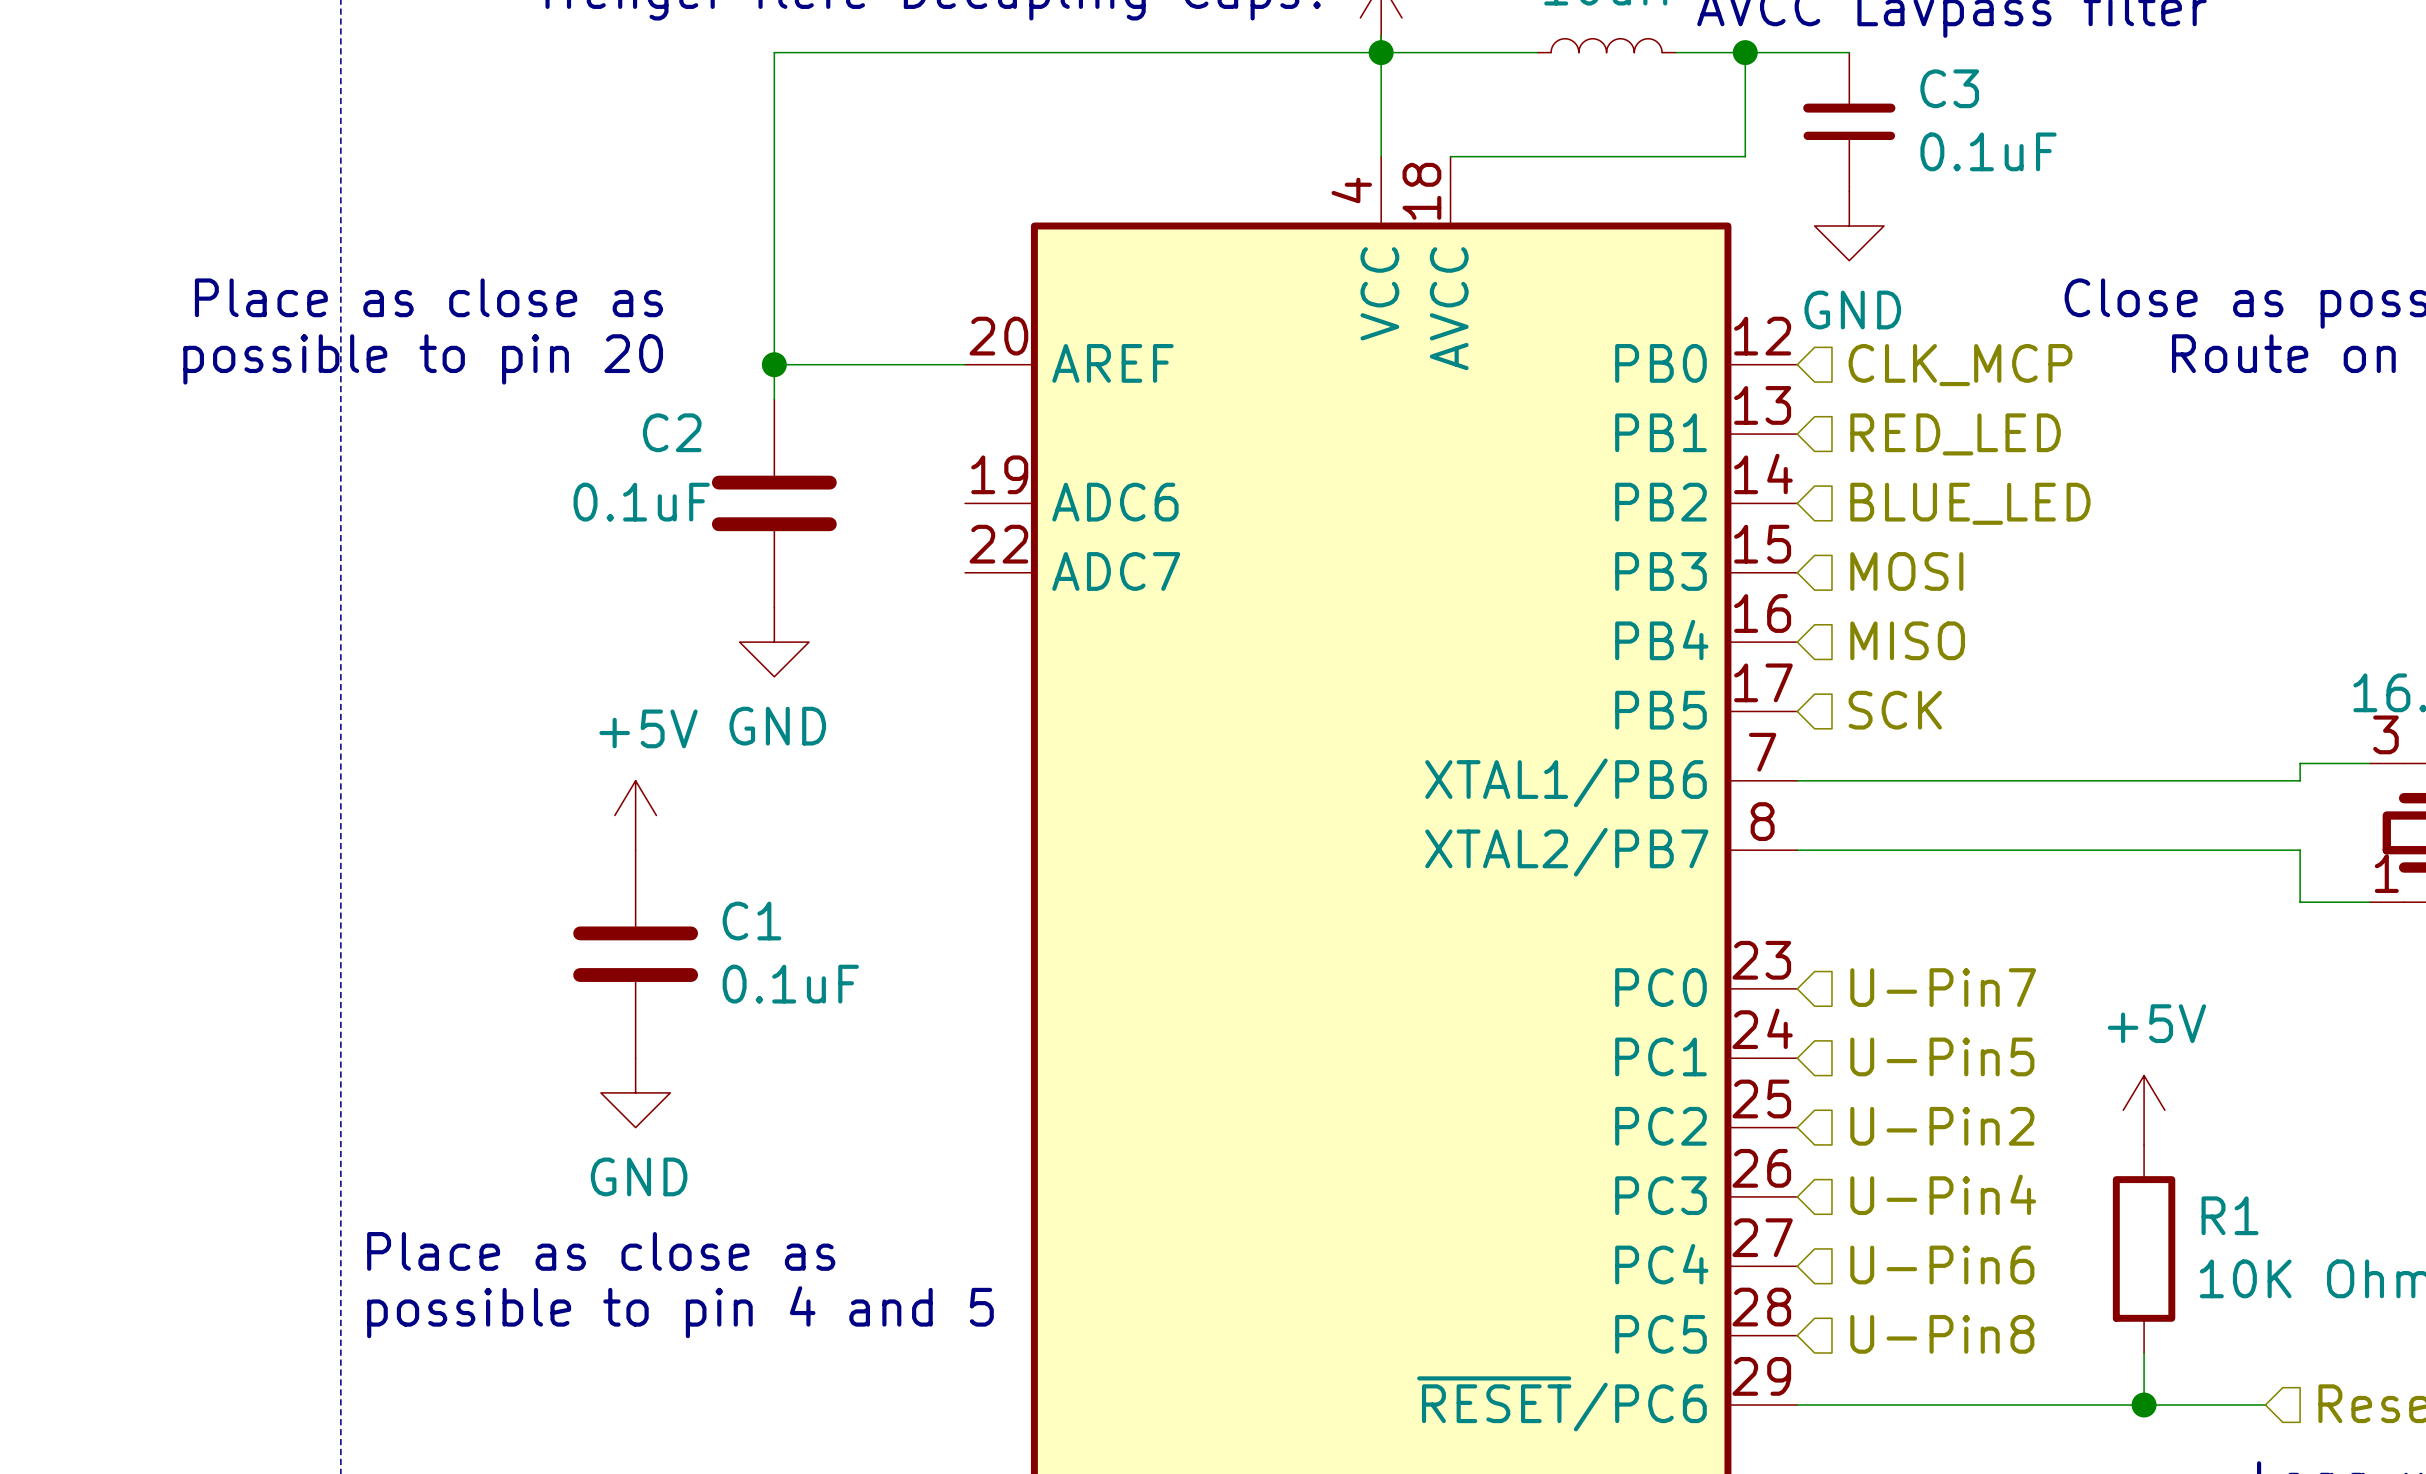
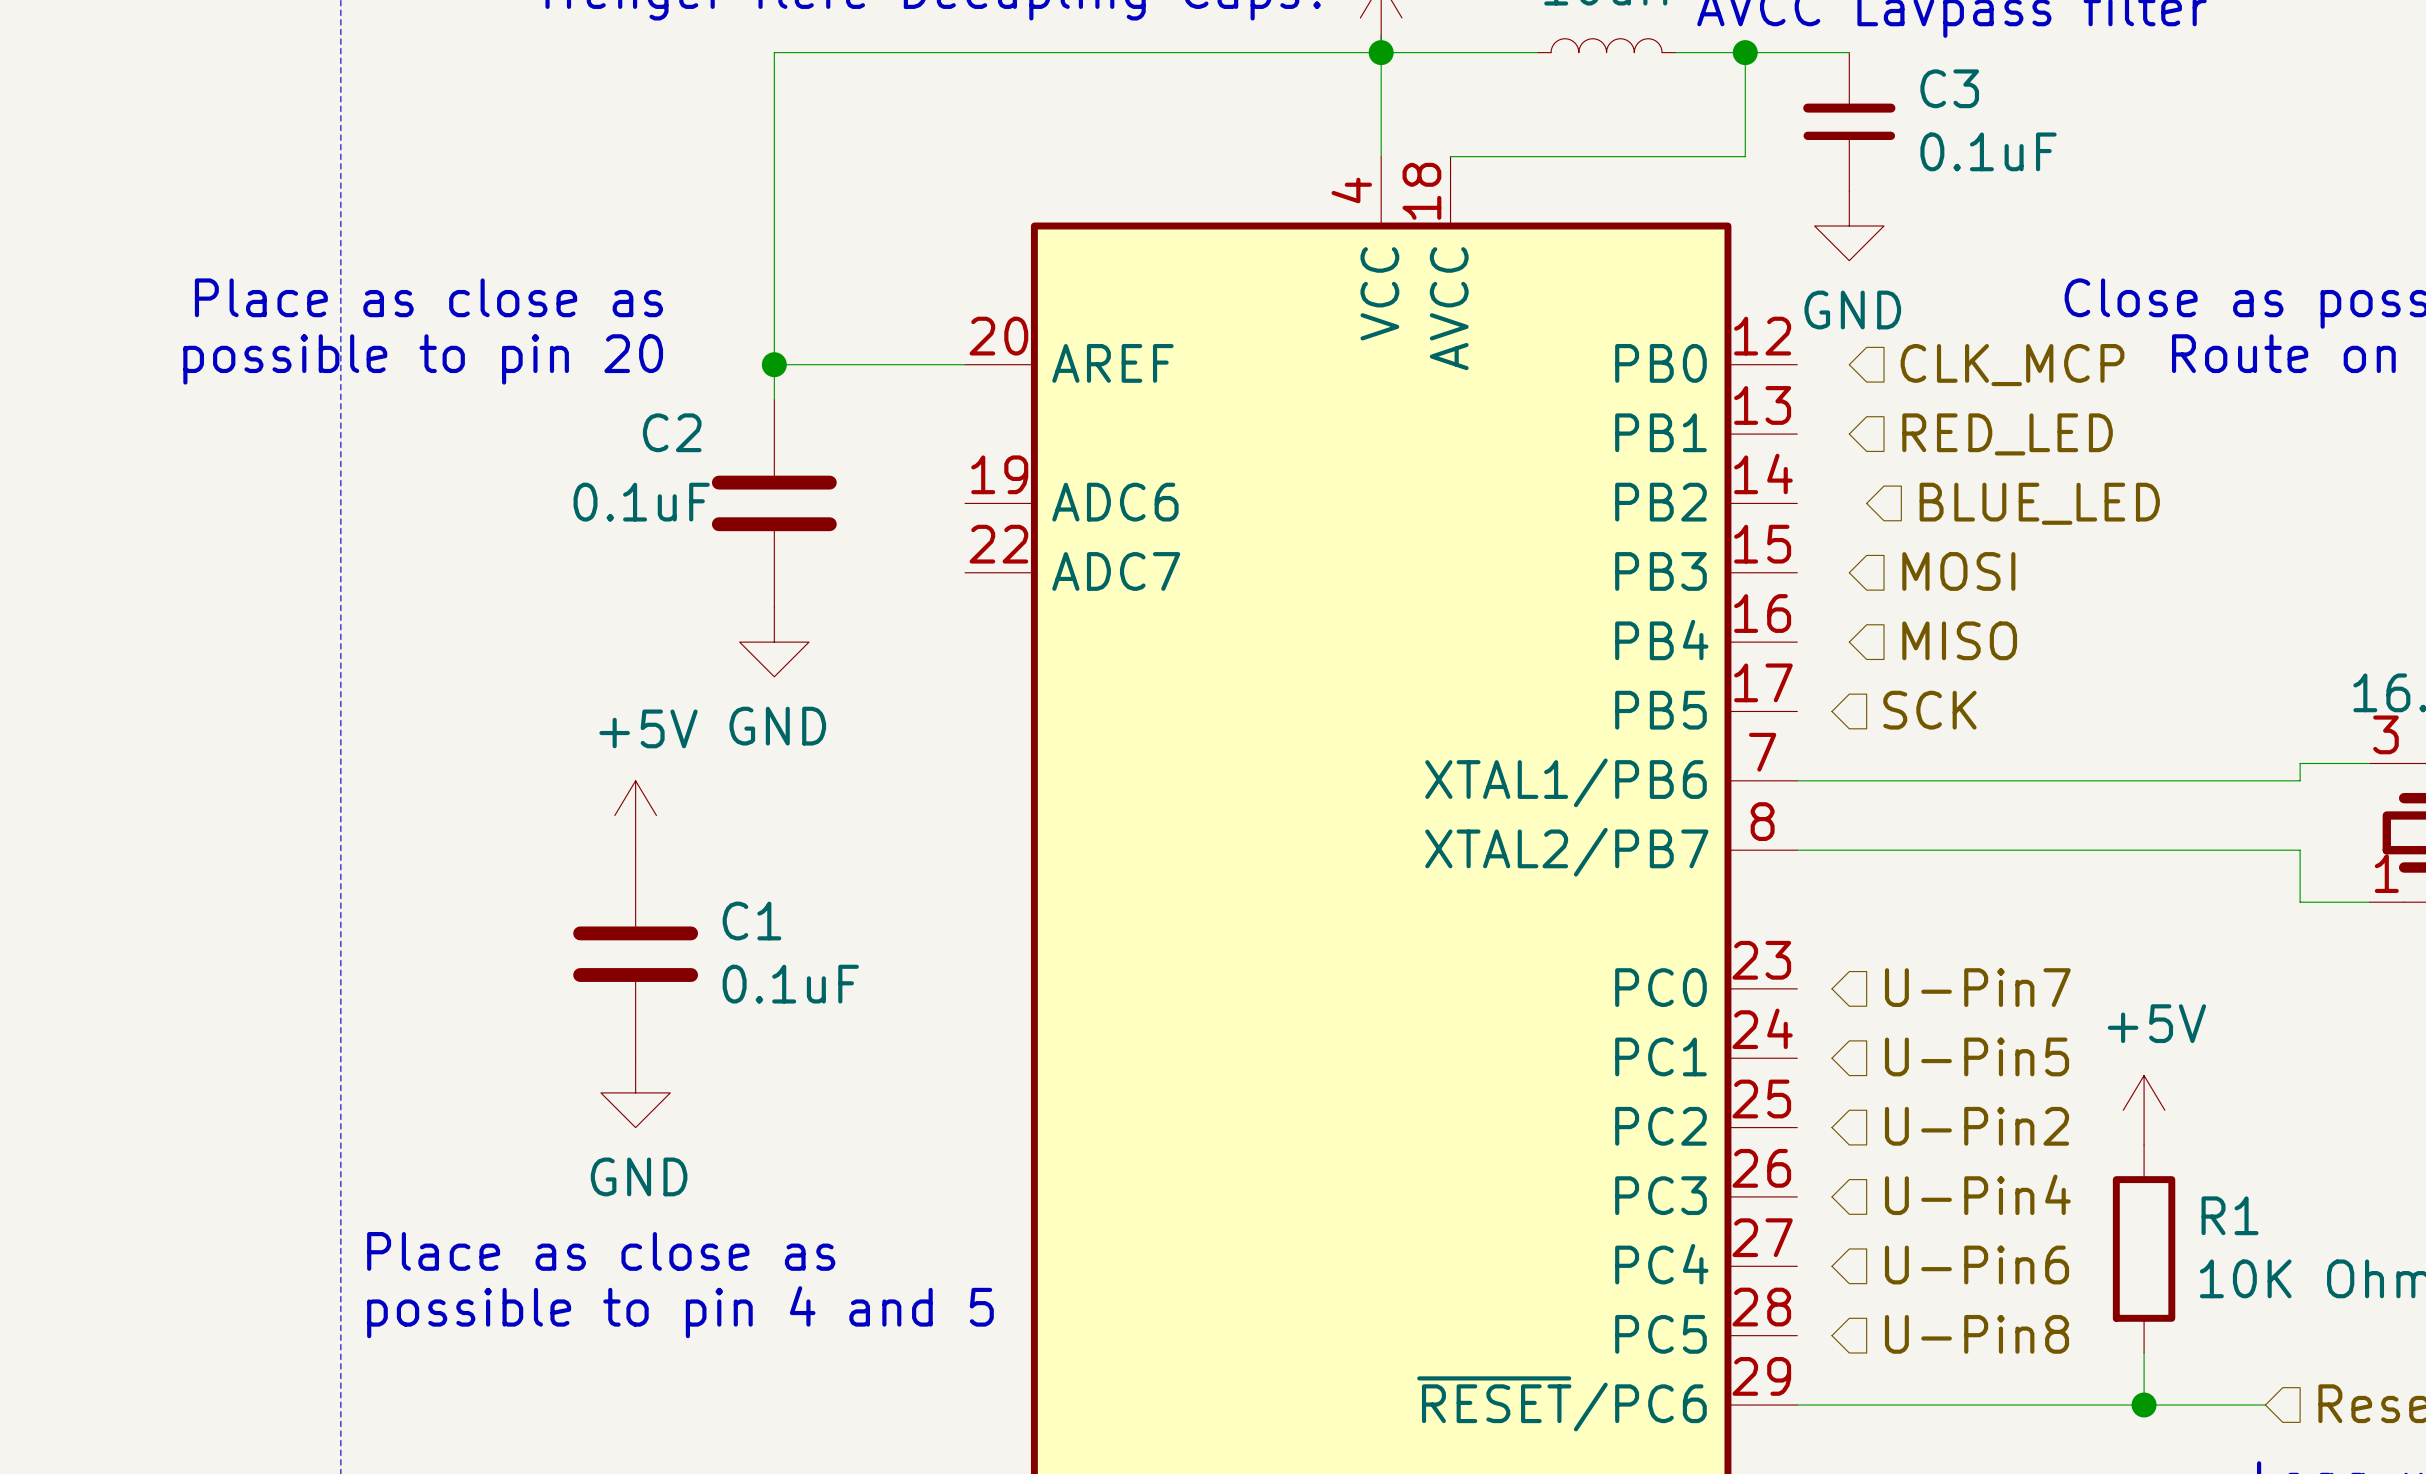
hierarchical label position: CLK_MCP (1960, 365) -> CLK_MCP (2012, 365)
hierarchical label position: RED_LED (1955, 434) -> RED_LED (2007, 434)
hierarchical label position: BLUE_LED (1970, 503) -> BLUE_LED (2039, 503)
hierarchical label position: MOSI (1906, 571) -> MOSI (1958, 571)
hierarchical label position: MISO (1907, 640) -> MISO (1959, 640)
hierarchical label position: SCK (1895, 710) -> SCK (1929, 710)
hierarchical label position: U-Pin7 (1943, 987) -> U-Pin7 (1977, 987)
hierarchical label position: U-Pin5 (1942, 1056) -> U-Pin5 (1977, 1056)
hierarchical label position: U-Pin2 (1942, 1126) -> U-Pin2 (1977, 1126)
hierarchical label position: U-Pin4 (1943, 1194) -> U-Pin4 (1977, 1194)
hierarchical label position: U-Pin6 (1942, 1265) -> U-Pin6 (1977, 1265)
hierarchical label position: U-Pin8 (1942, 1334) -> U-Pin8 (1977, 1334)

